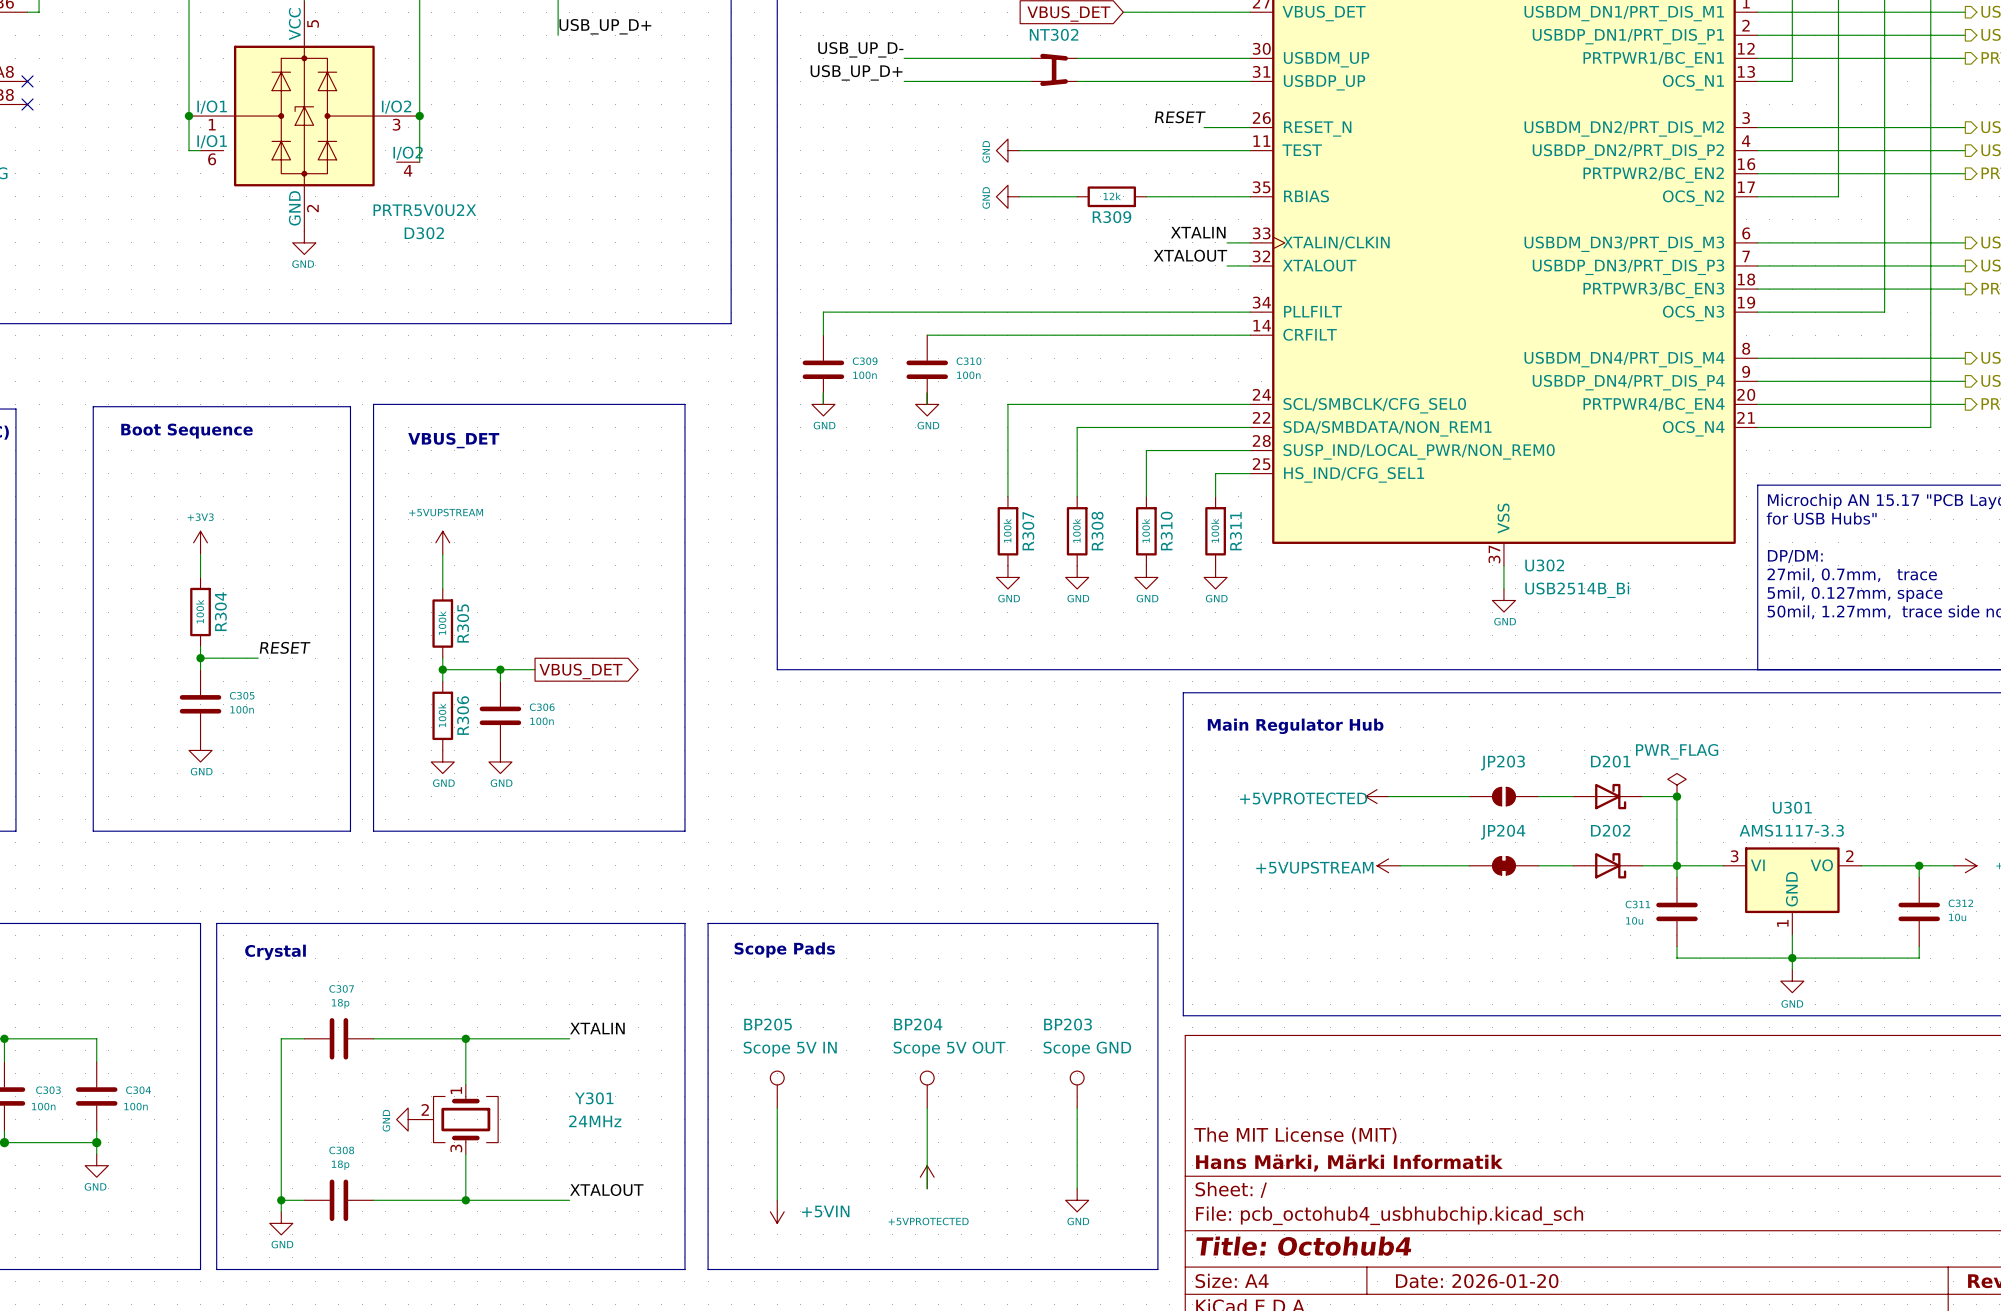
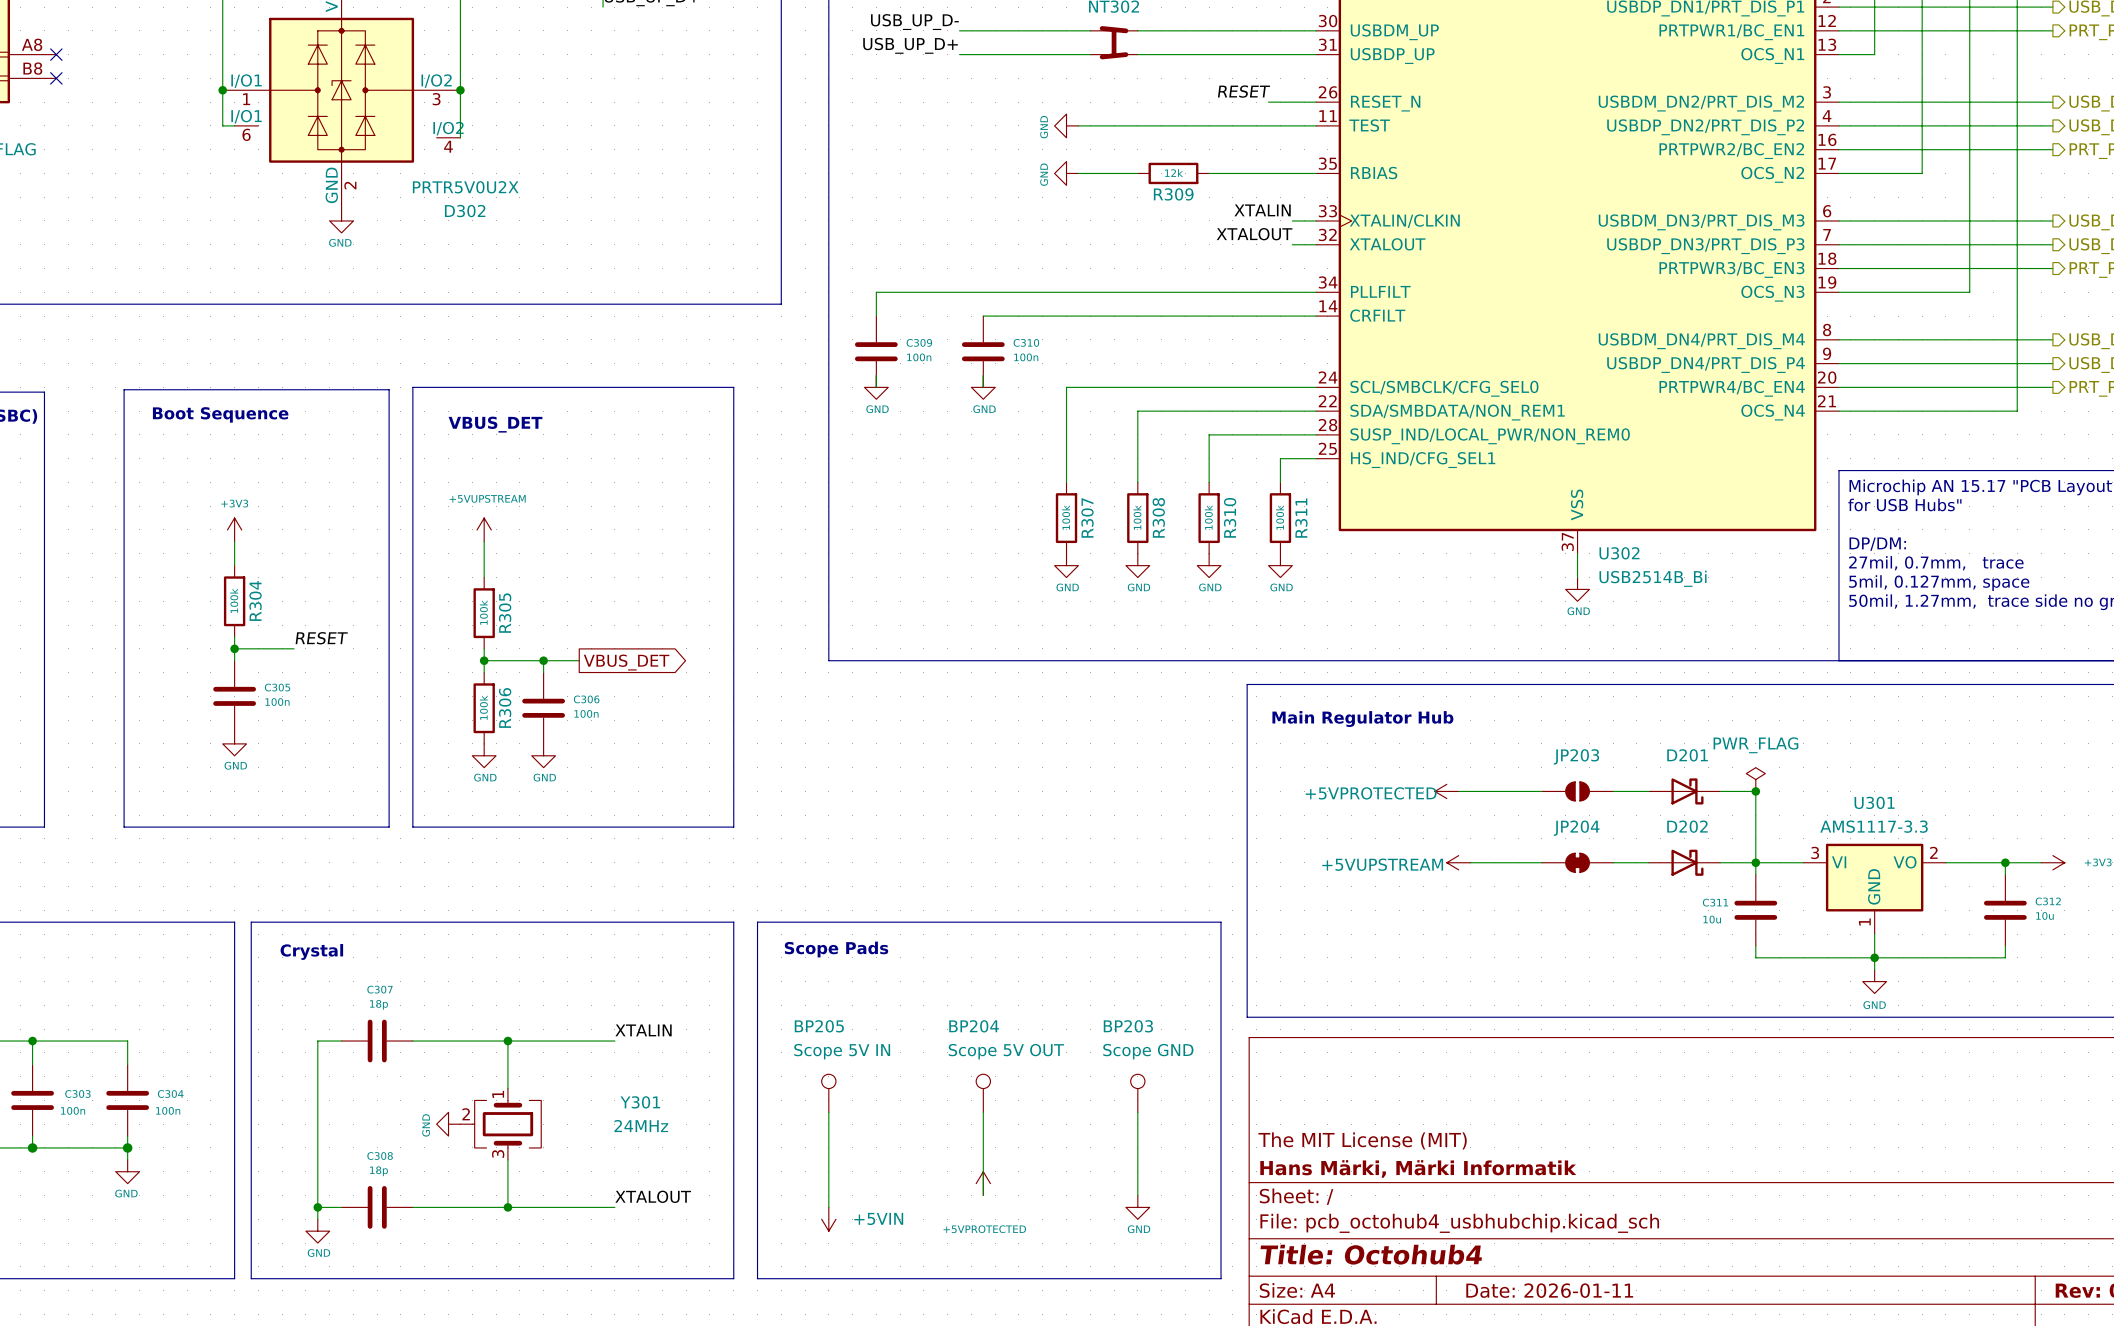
title block: Date: 2026-01-20 (1477, 1281) -> Date: 2026-01-11 (1549, 1290)

